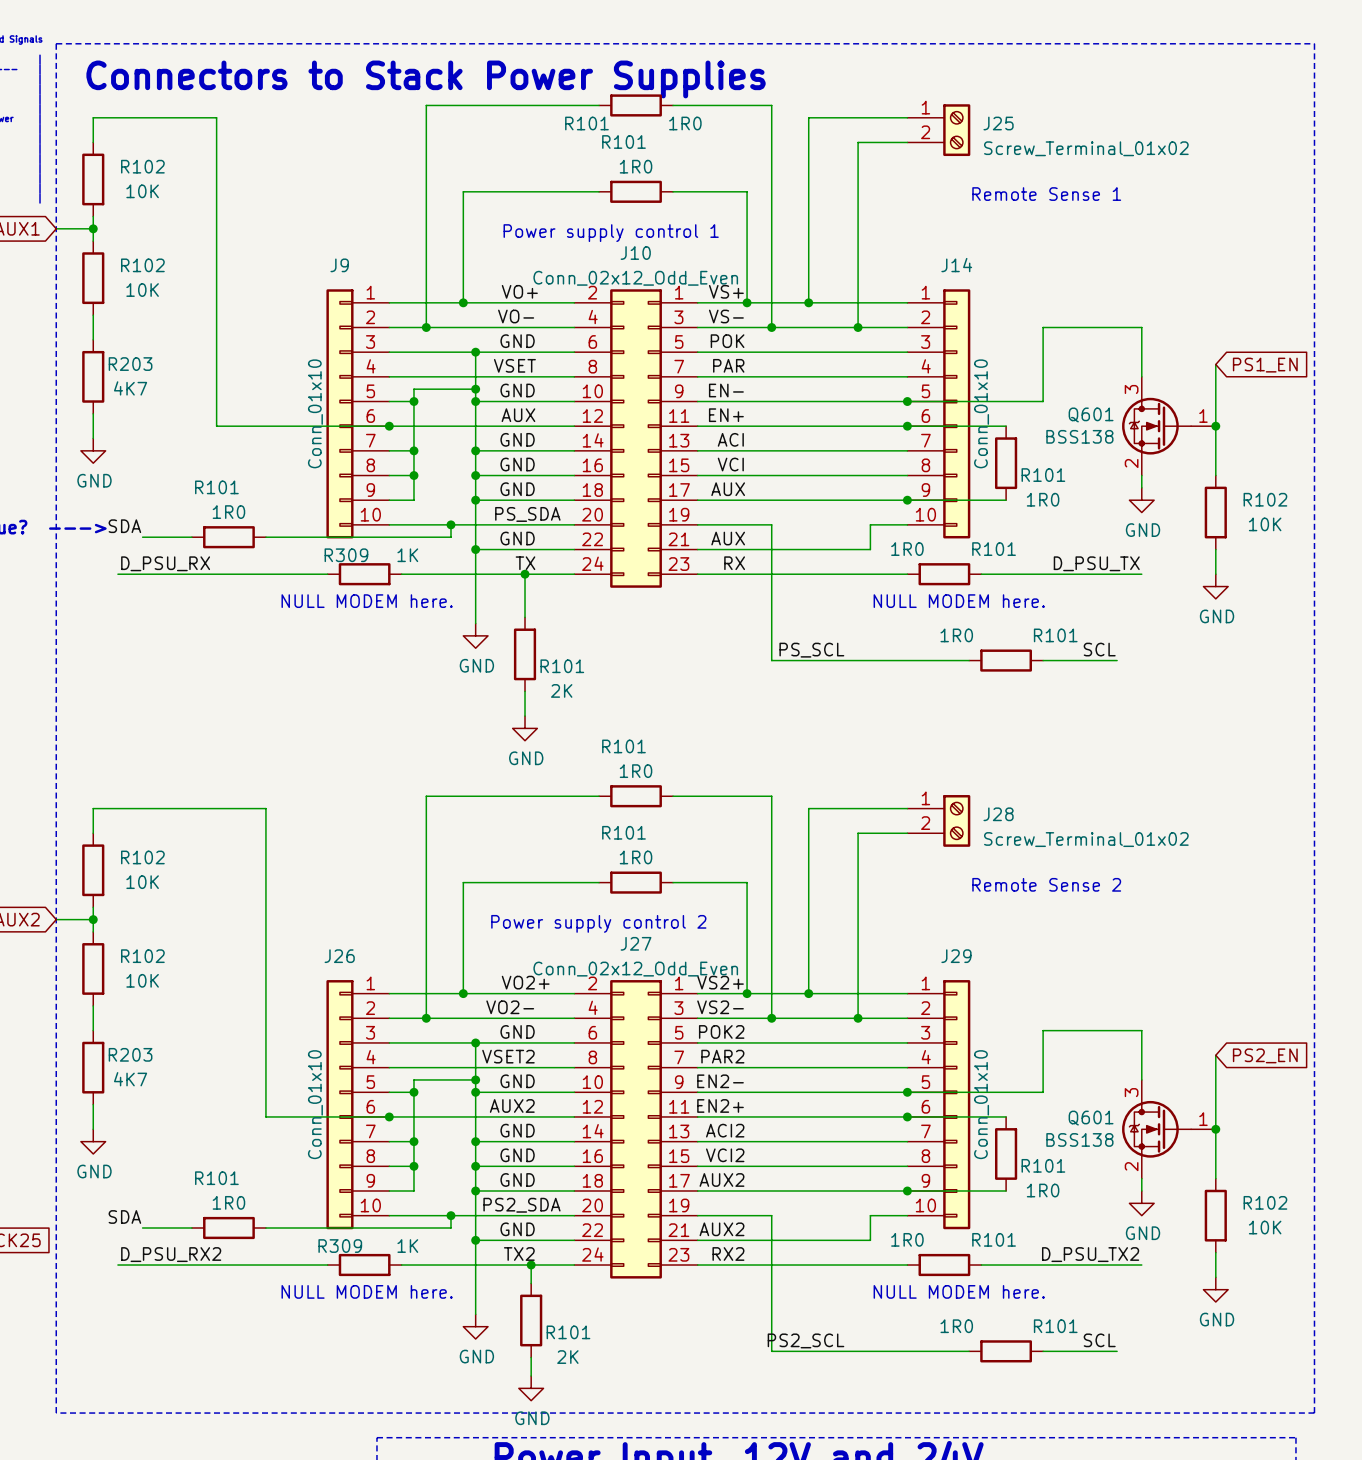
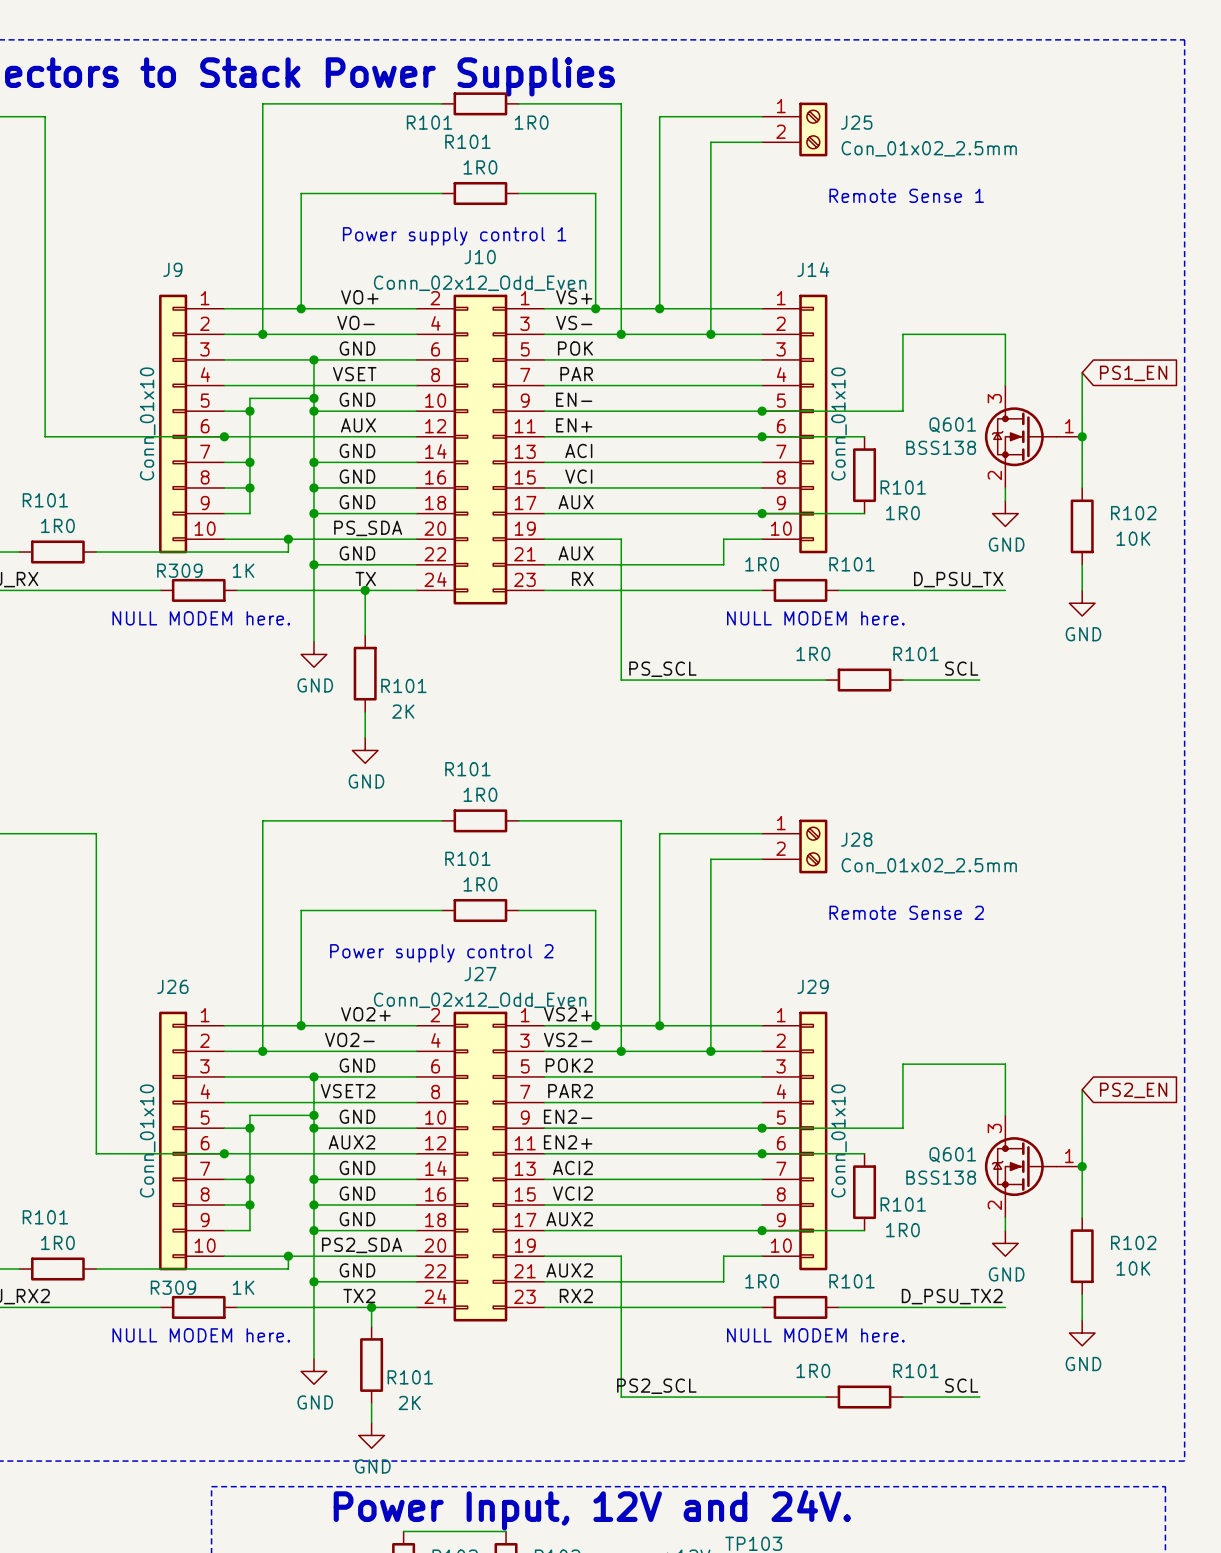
J25 value: Screw_Terminal_01x02 (1086, 148) -> Con_01x02_2.5mm (929, 148)
J28 value: Screw_Terminal_01x02 (1086, 839) -> Con_01x02_2.5mm (929, 865)

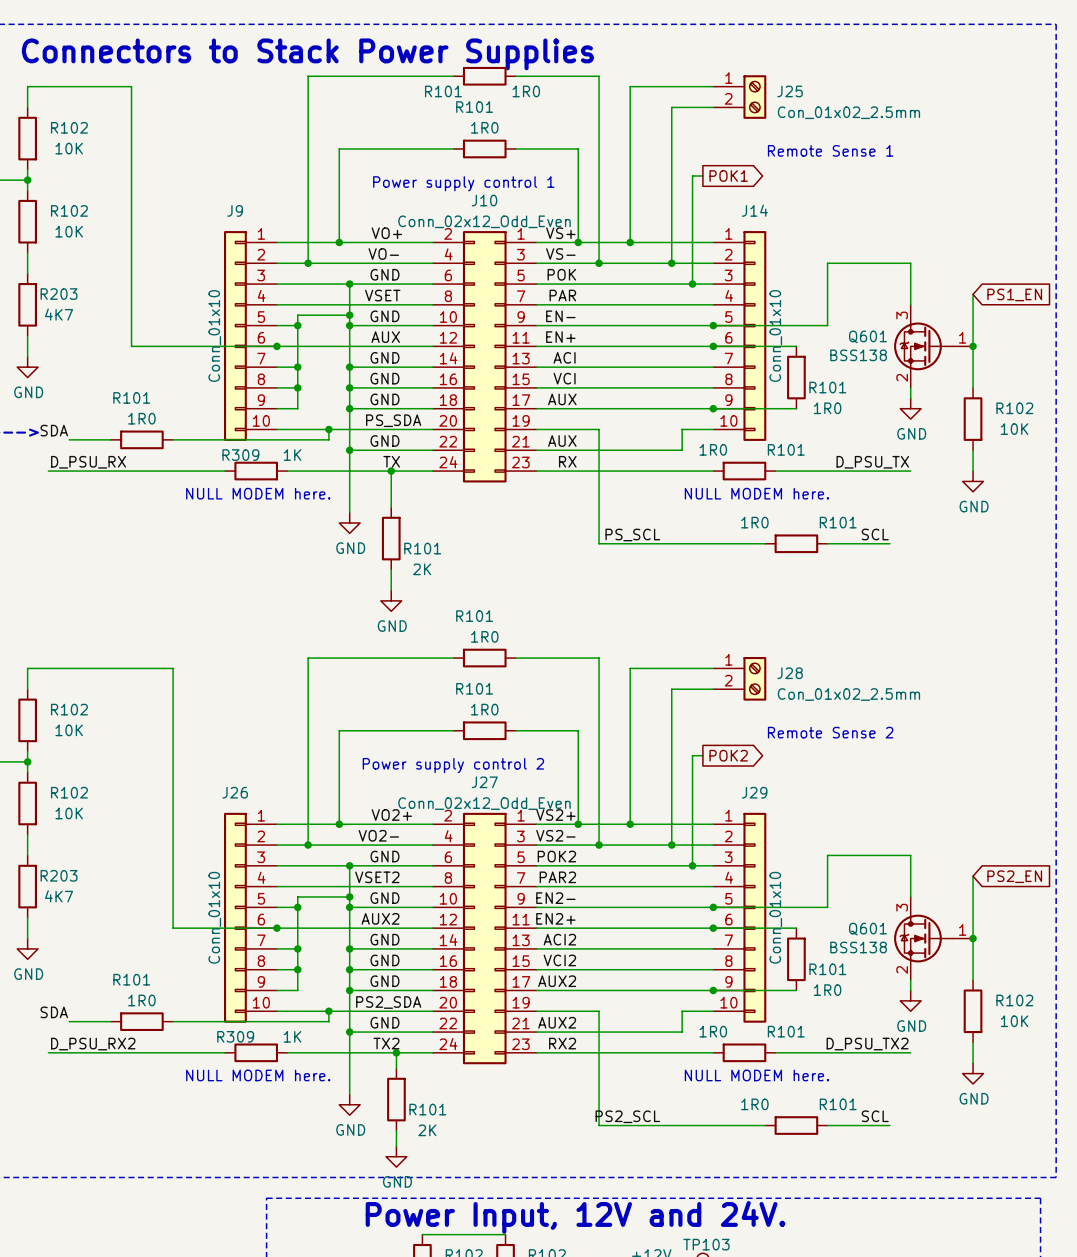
wire: none -> (702, 176) (692, 176) (692, 284)
global label: none -> POK1 (728, 176)
junction: none -> (692, 284)
wire: none -> (702, 755) (692, 755) (692, 865)
global label: none -> POK2 (728, 755)
junction: none -> (692, 865)

